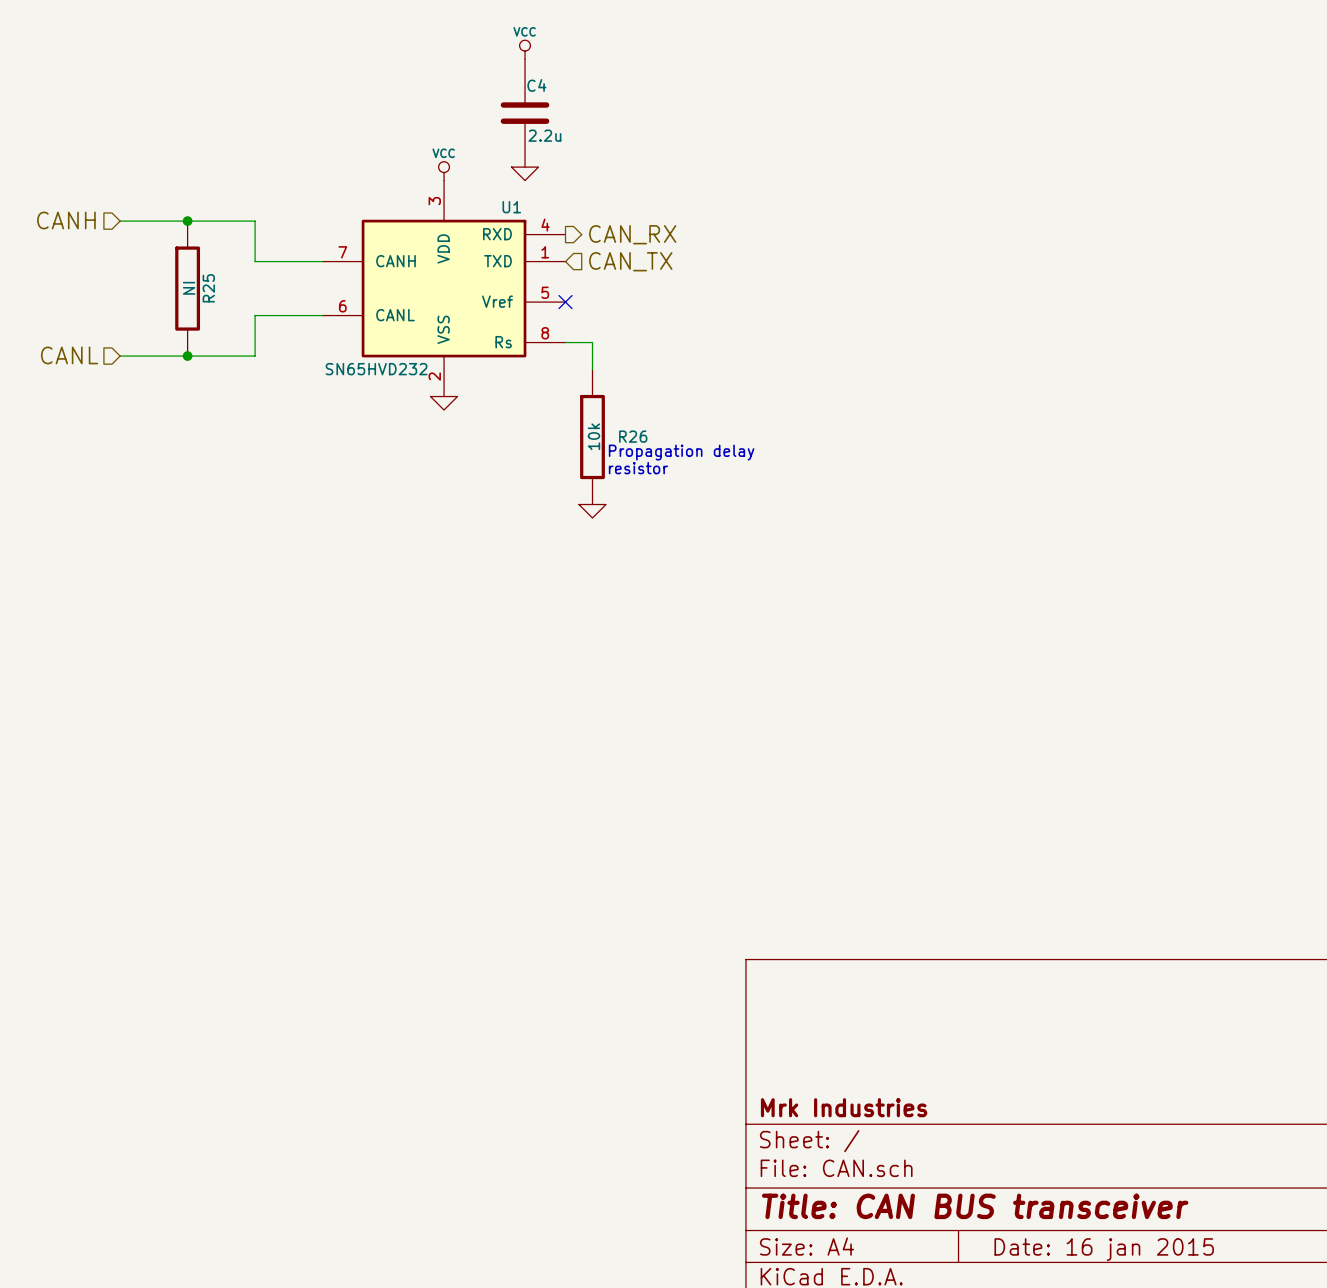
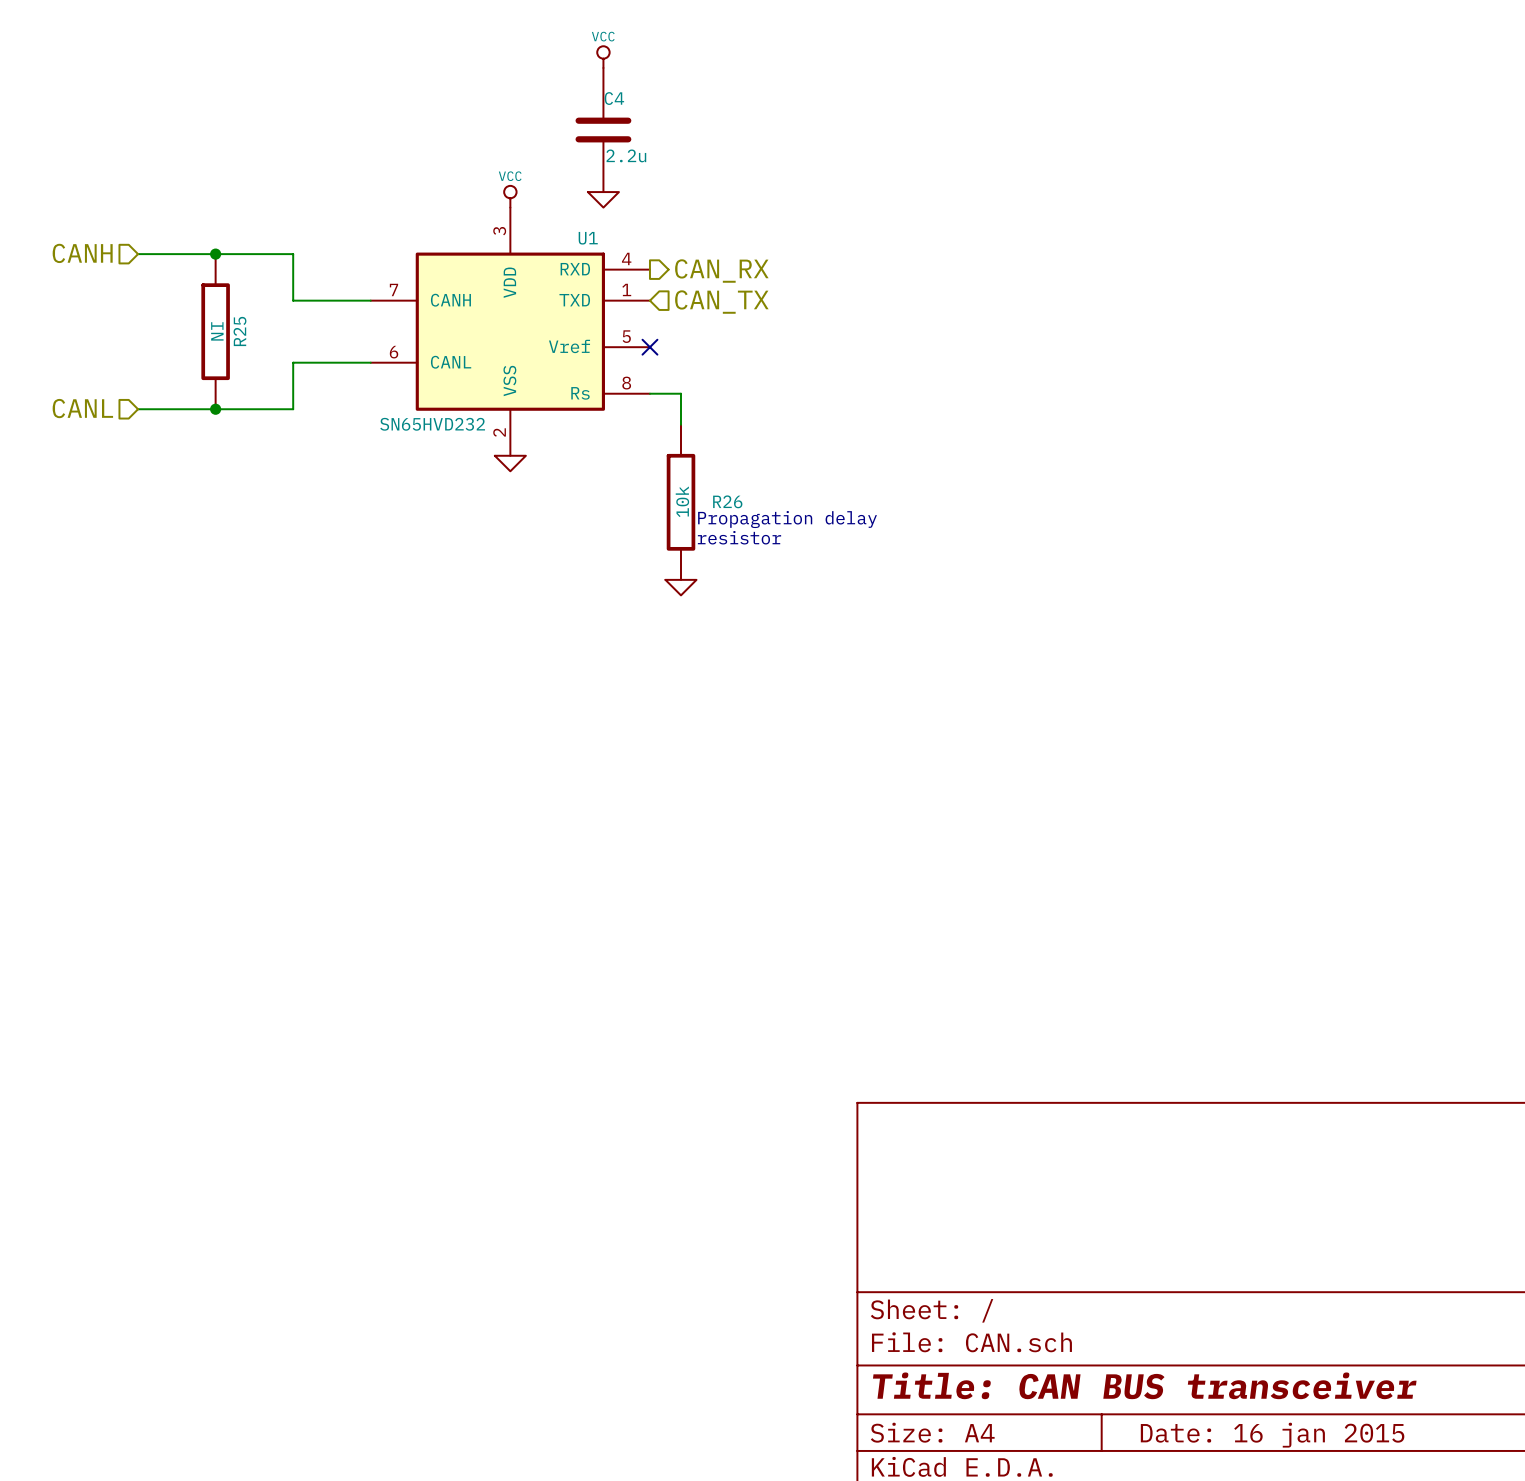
title block: Mrk Industries (844, 1107) -> none

